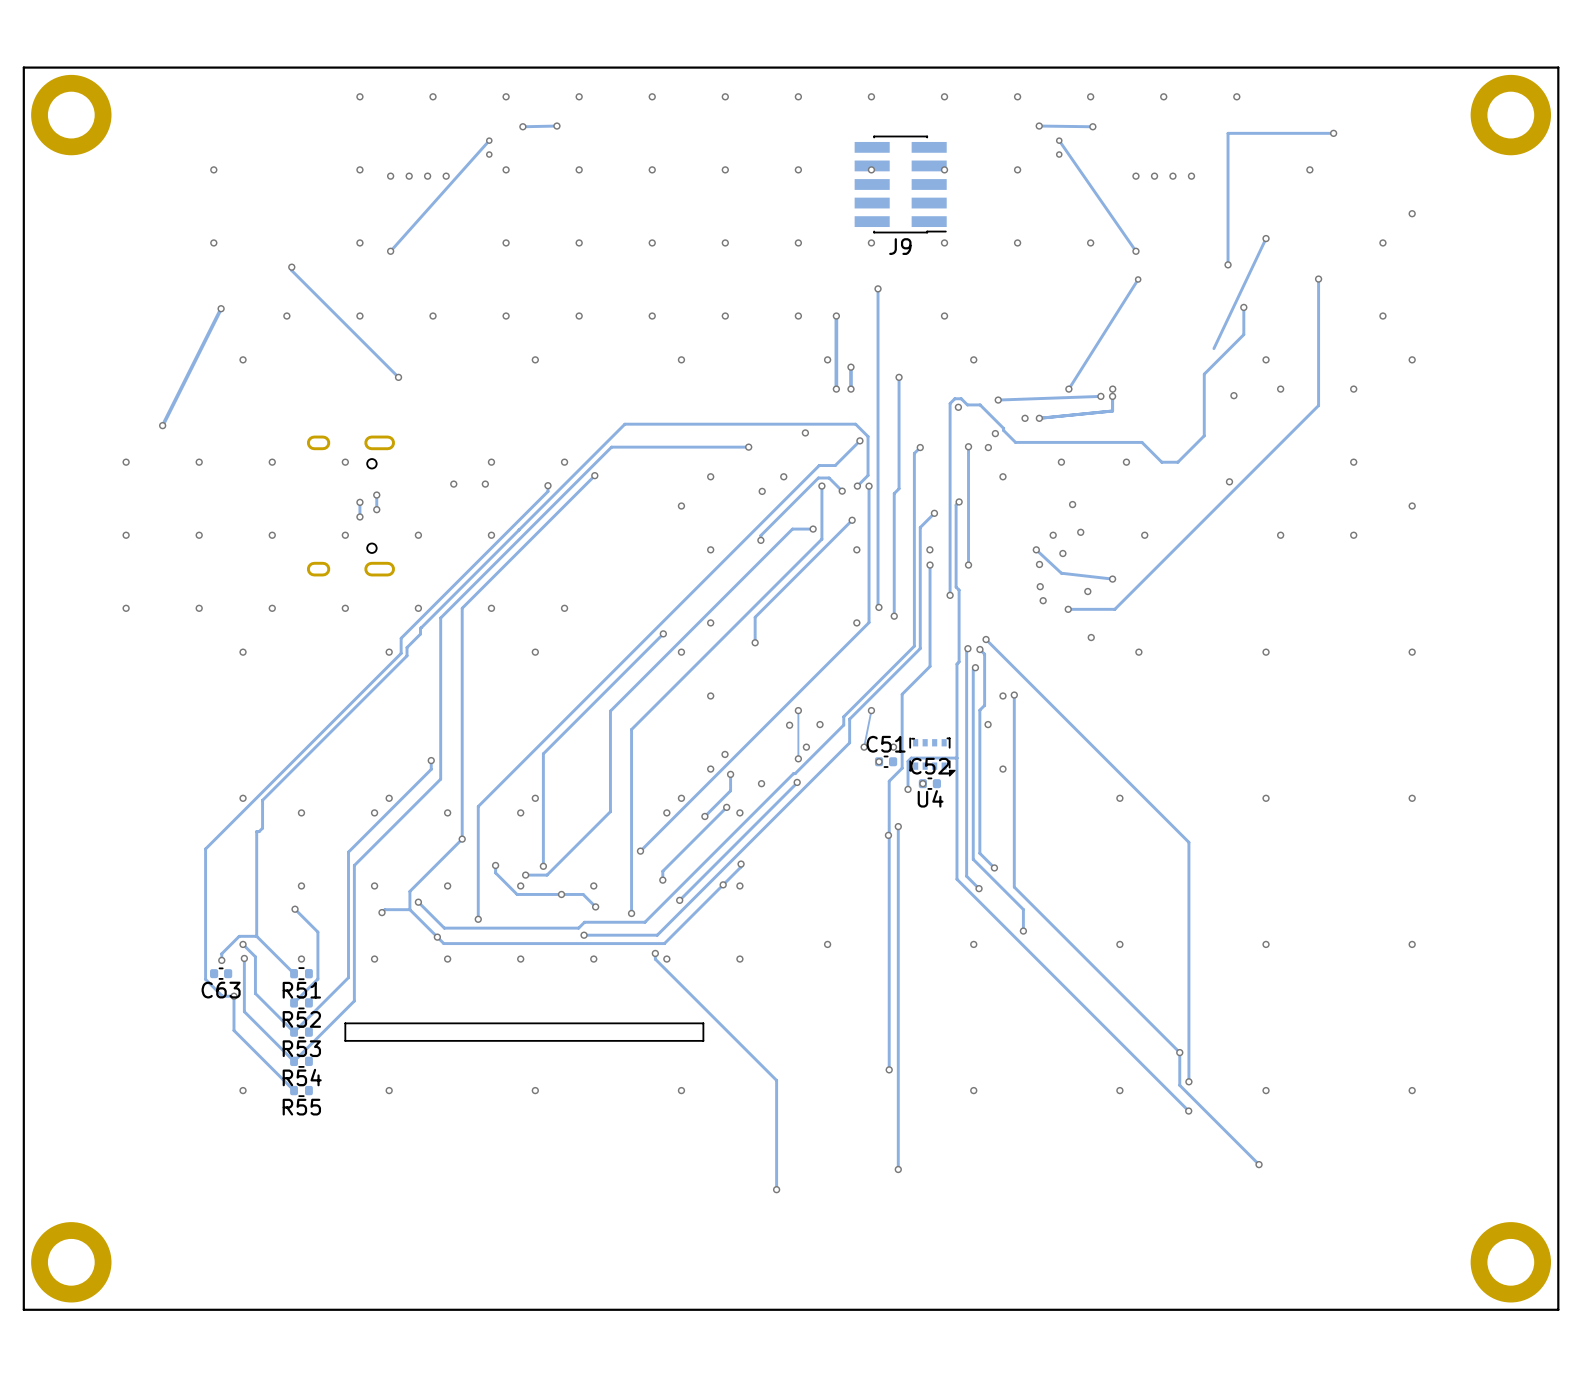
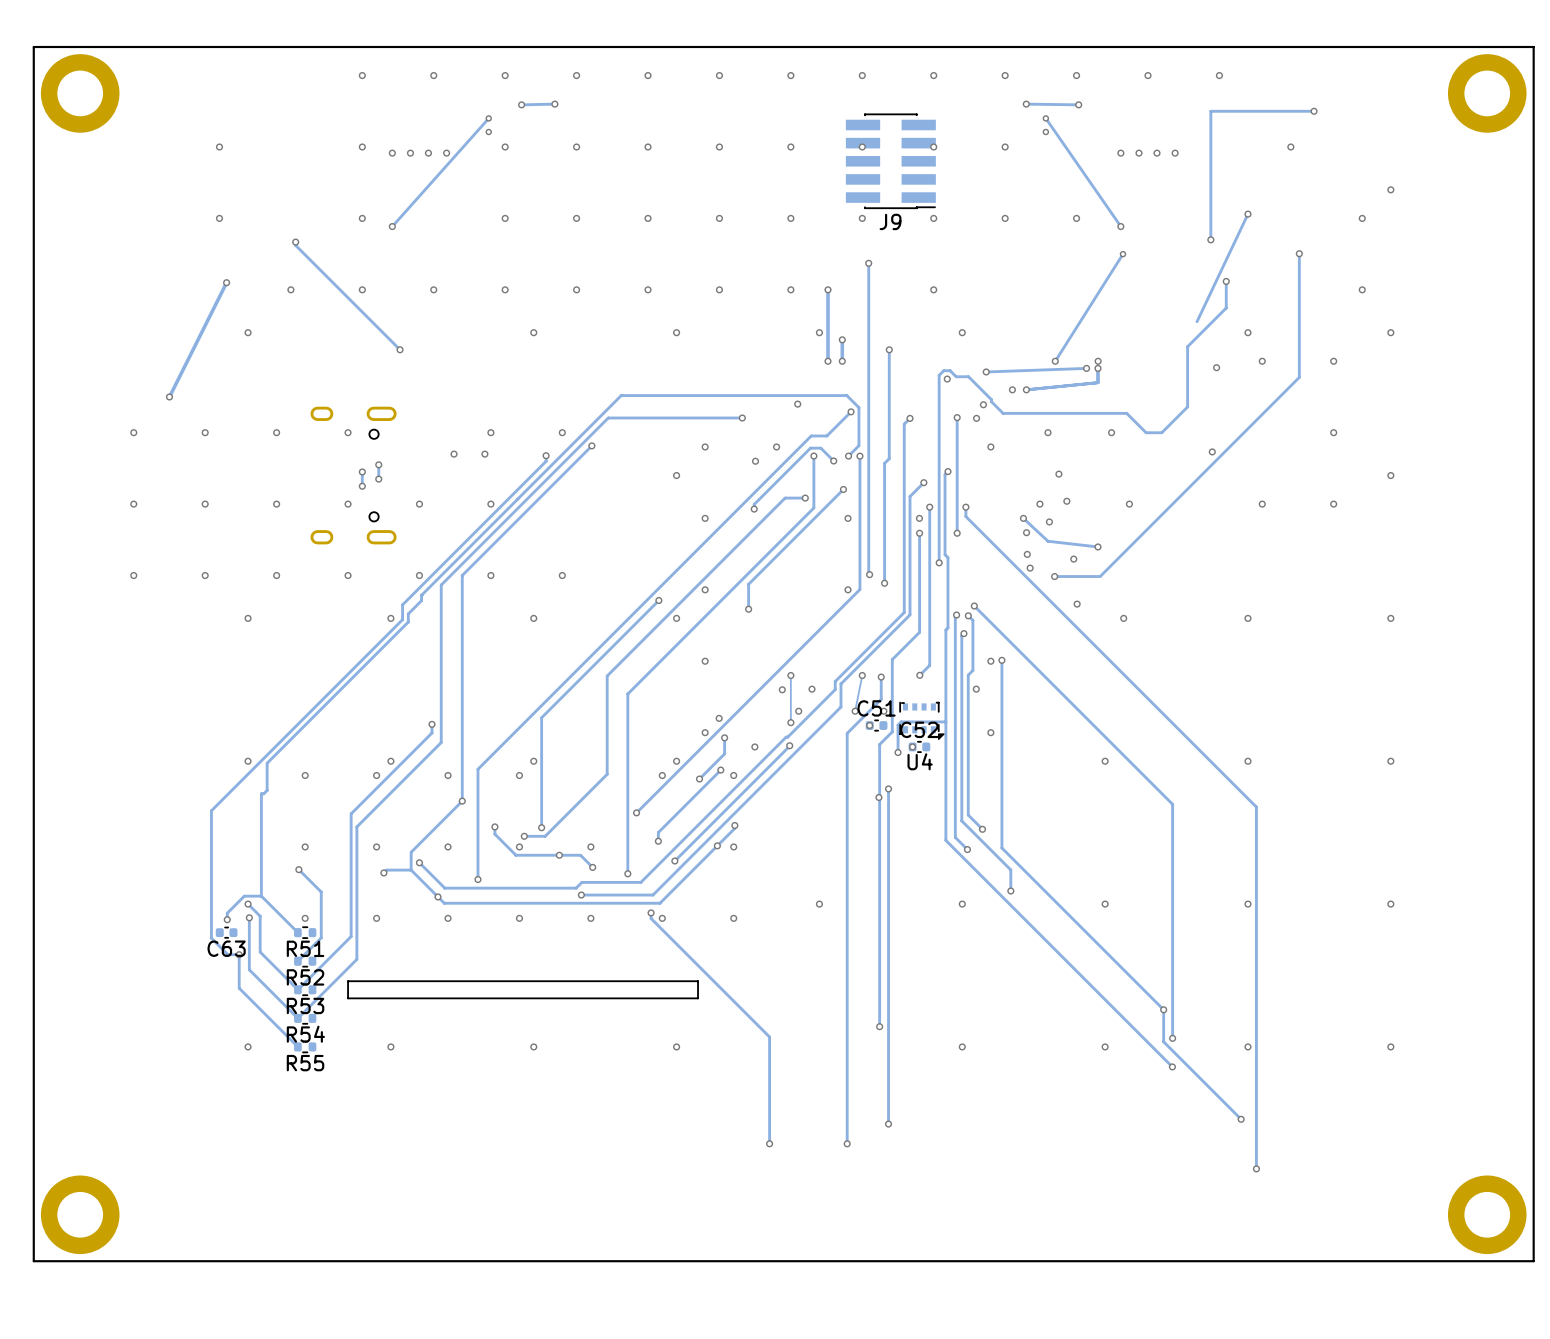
track: none -> (929, 507) (929, 665) (919, 675)
via: none -> (929, 507)
track: none -> (965, 507) (965, 516) (1256, 807) (1256, 1168)
via: none -> (965, 507)
via: none -> (919, 675)
track: none -> (881, 677) (881, 699) (847, 733) (847, 1143)
via: none -> (881, 677)
via: none -> (847, 1143)
via: none -> (1256, 1168)

